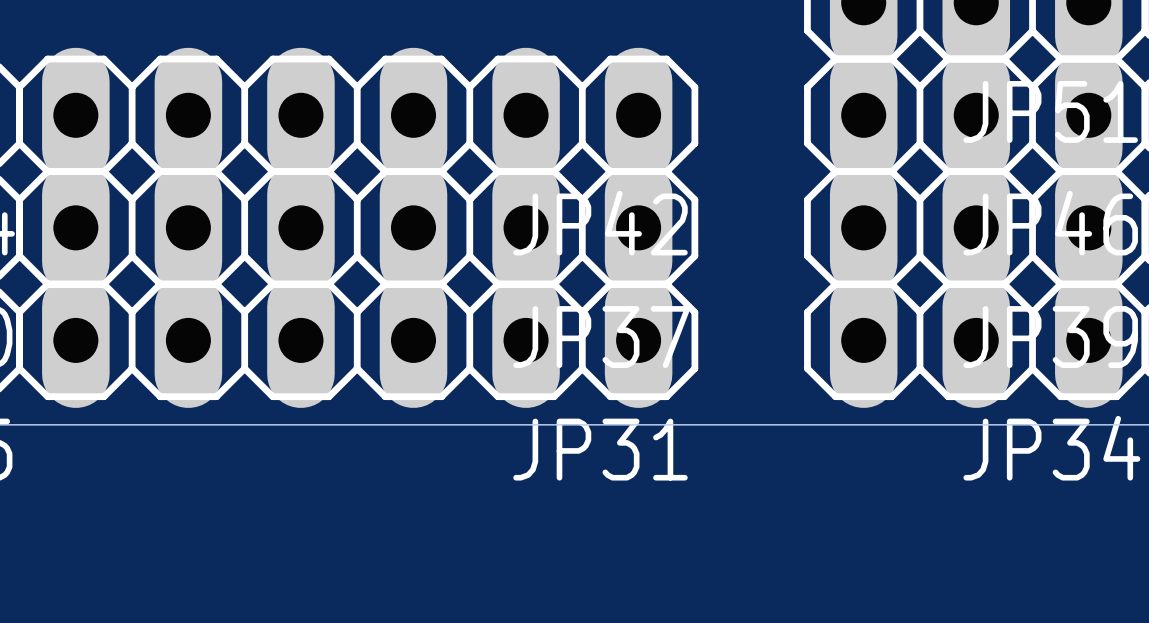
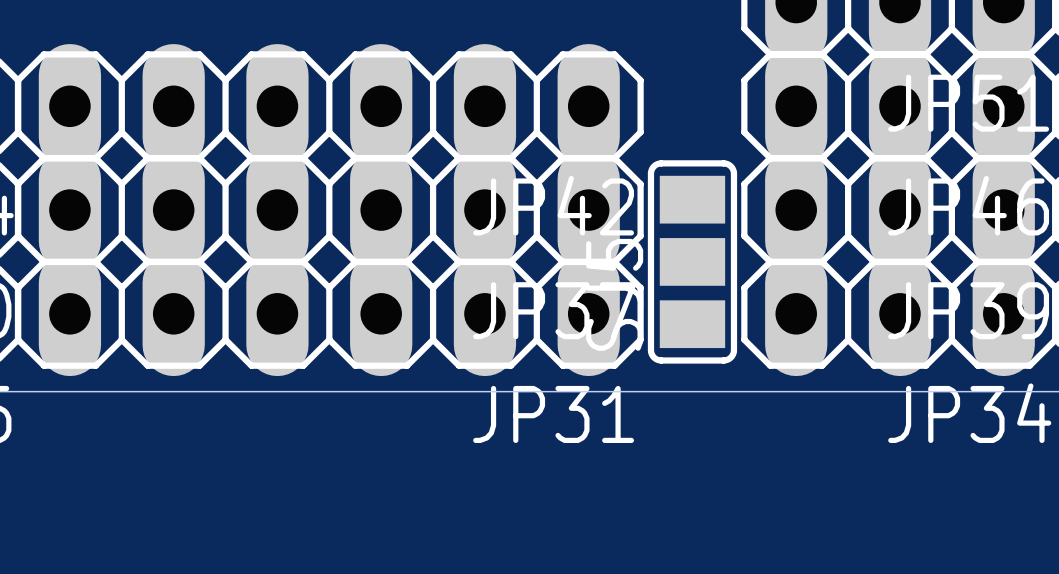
part: none -> (692, 261)

